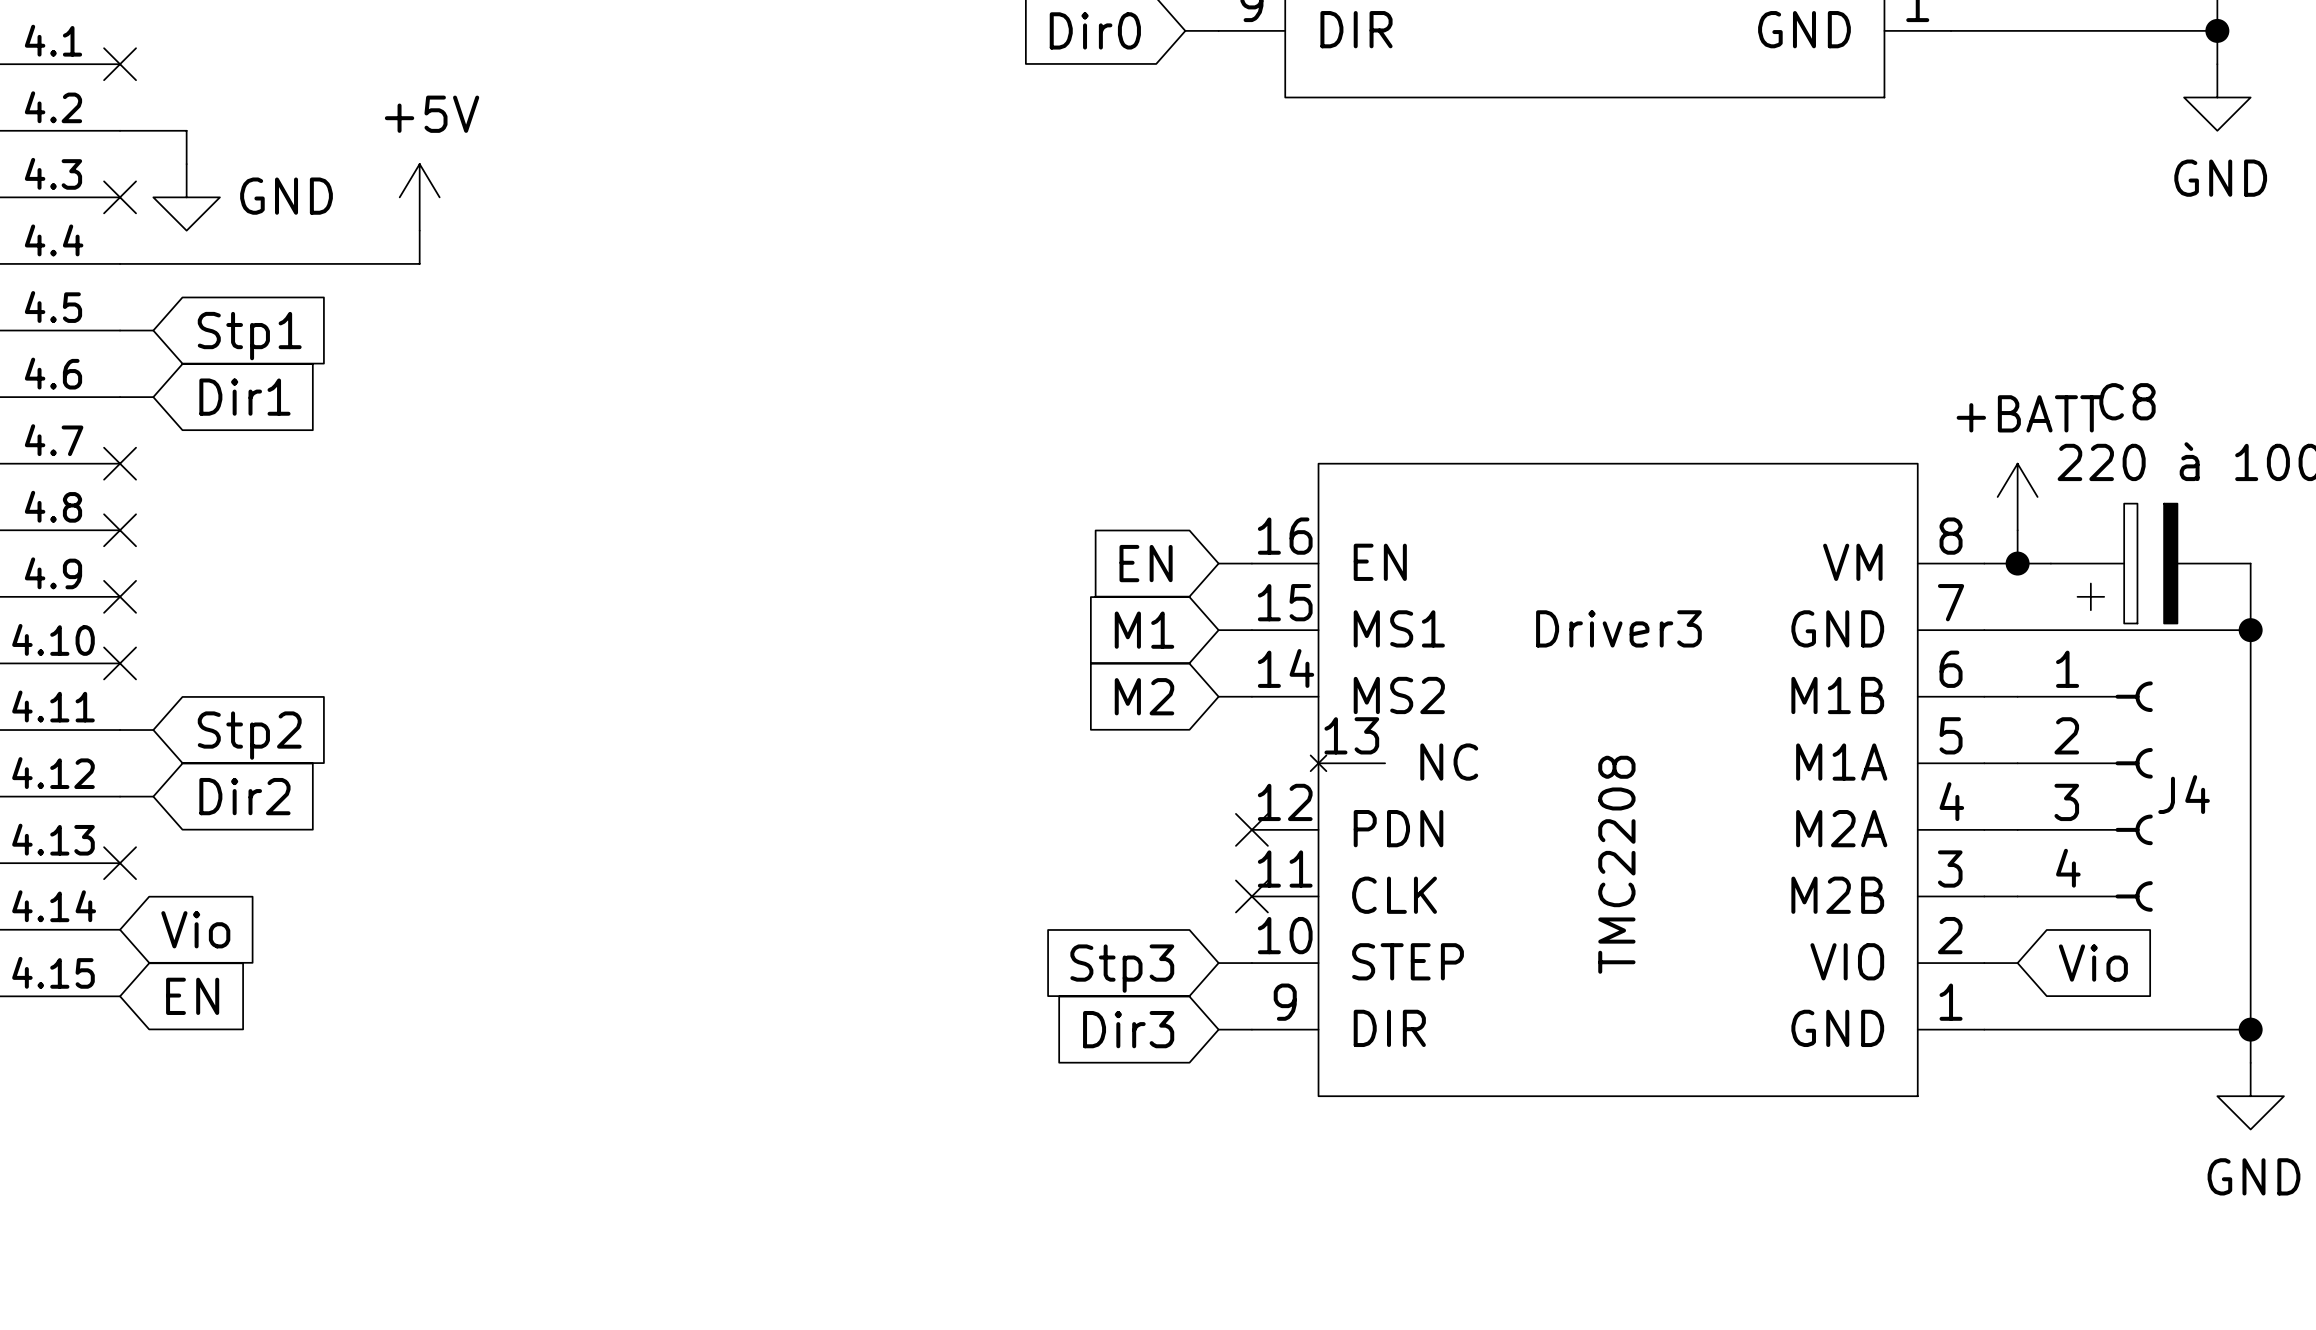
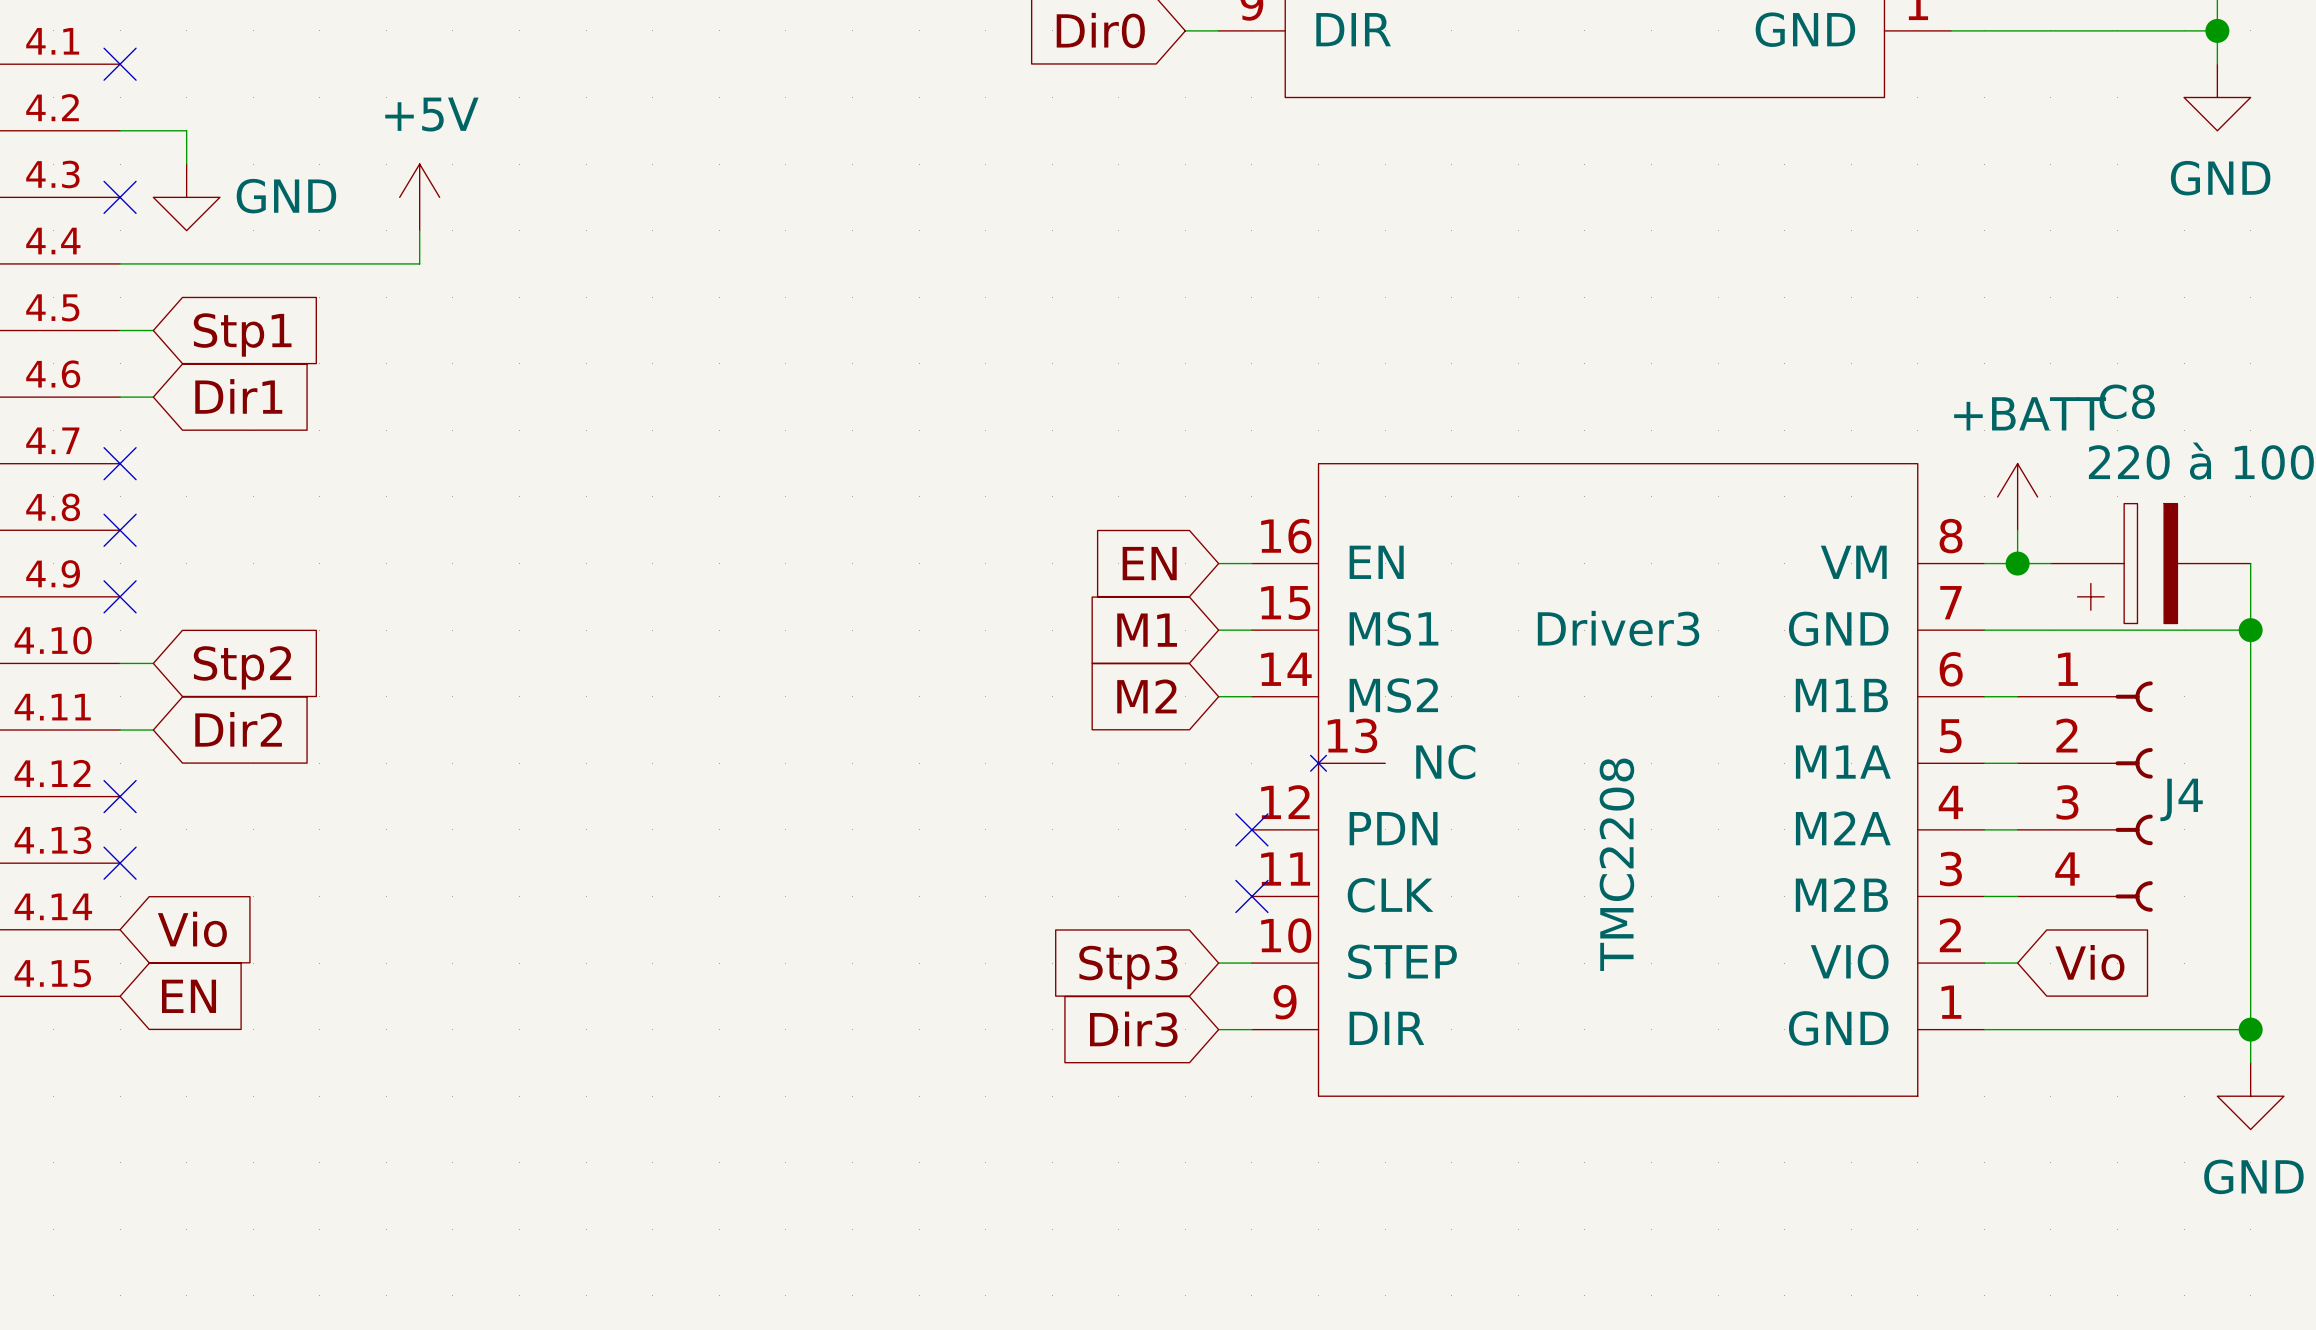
no-connect mark position: (120, 663) -> (120, 796)
global label: none -> Stp2 (242, 667)
global label: Stp2 (249, 735) -> Dir2 (238, 729)
wire: (120, 796) (153, 796) -> (120, 663) (153, 663)
global label: Dir2 (244, 796) -> none

